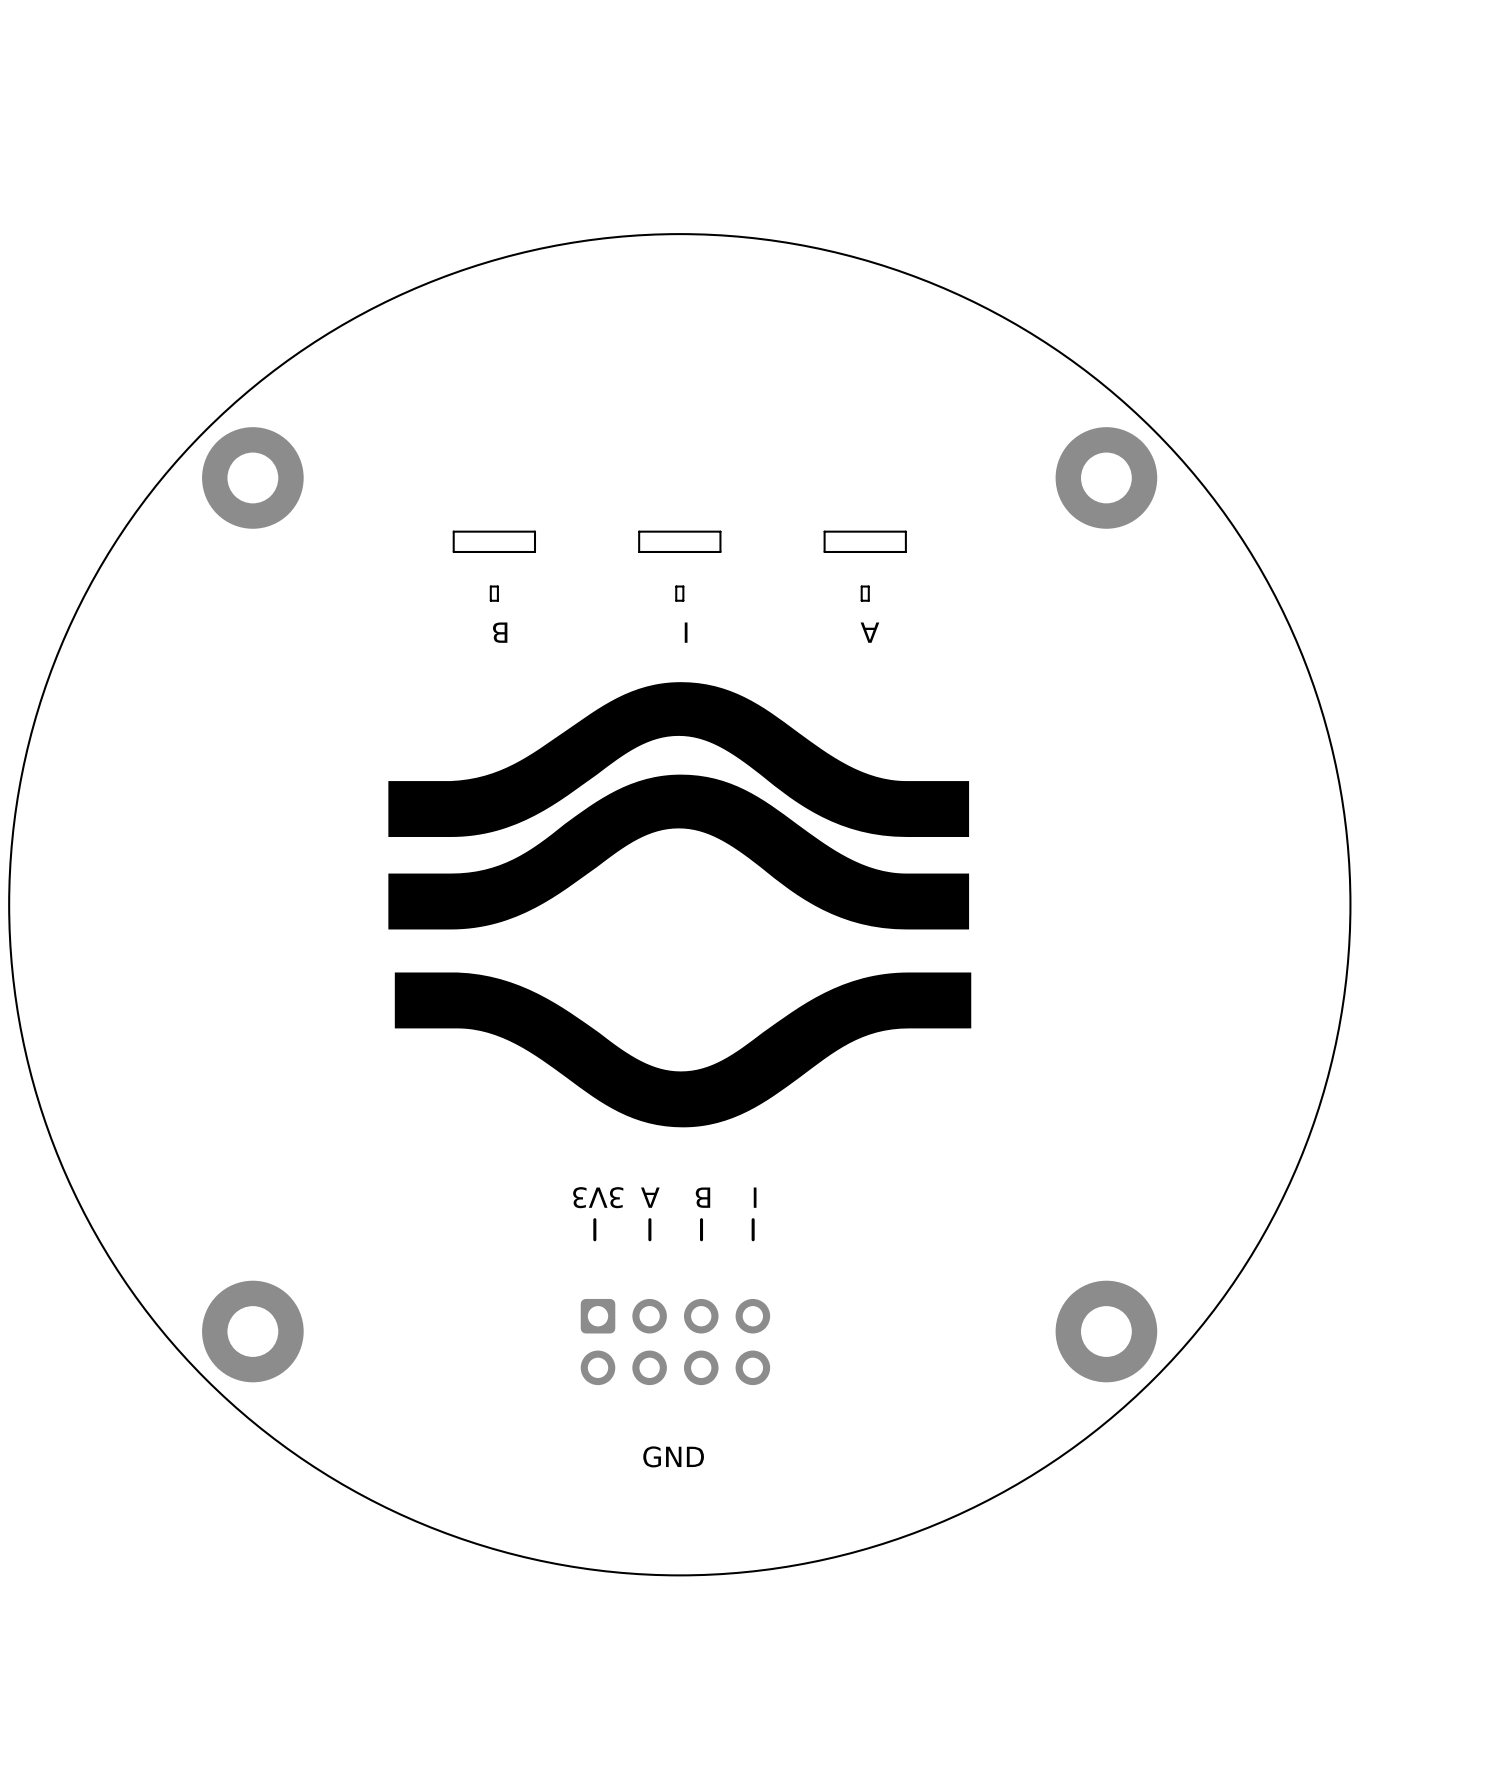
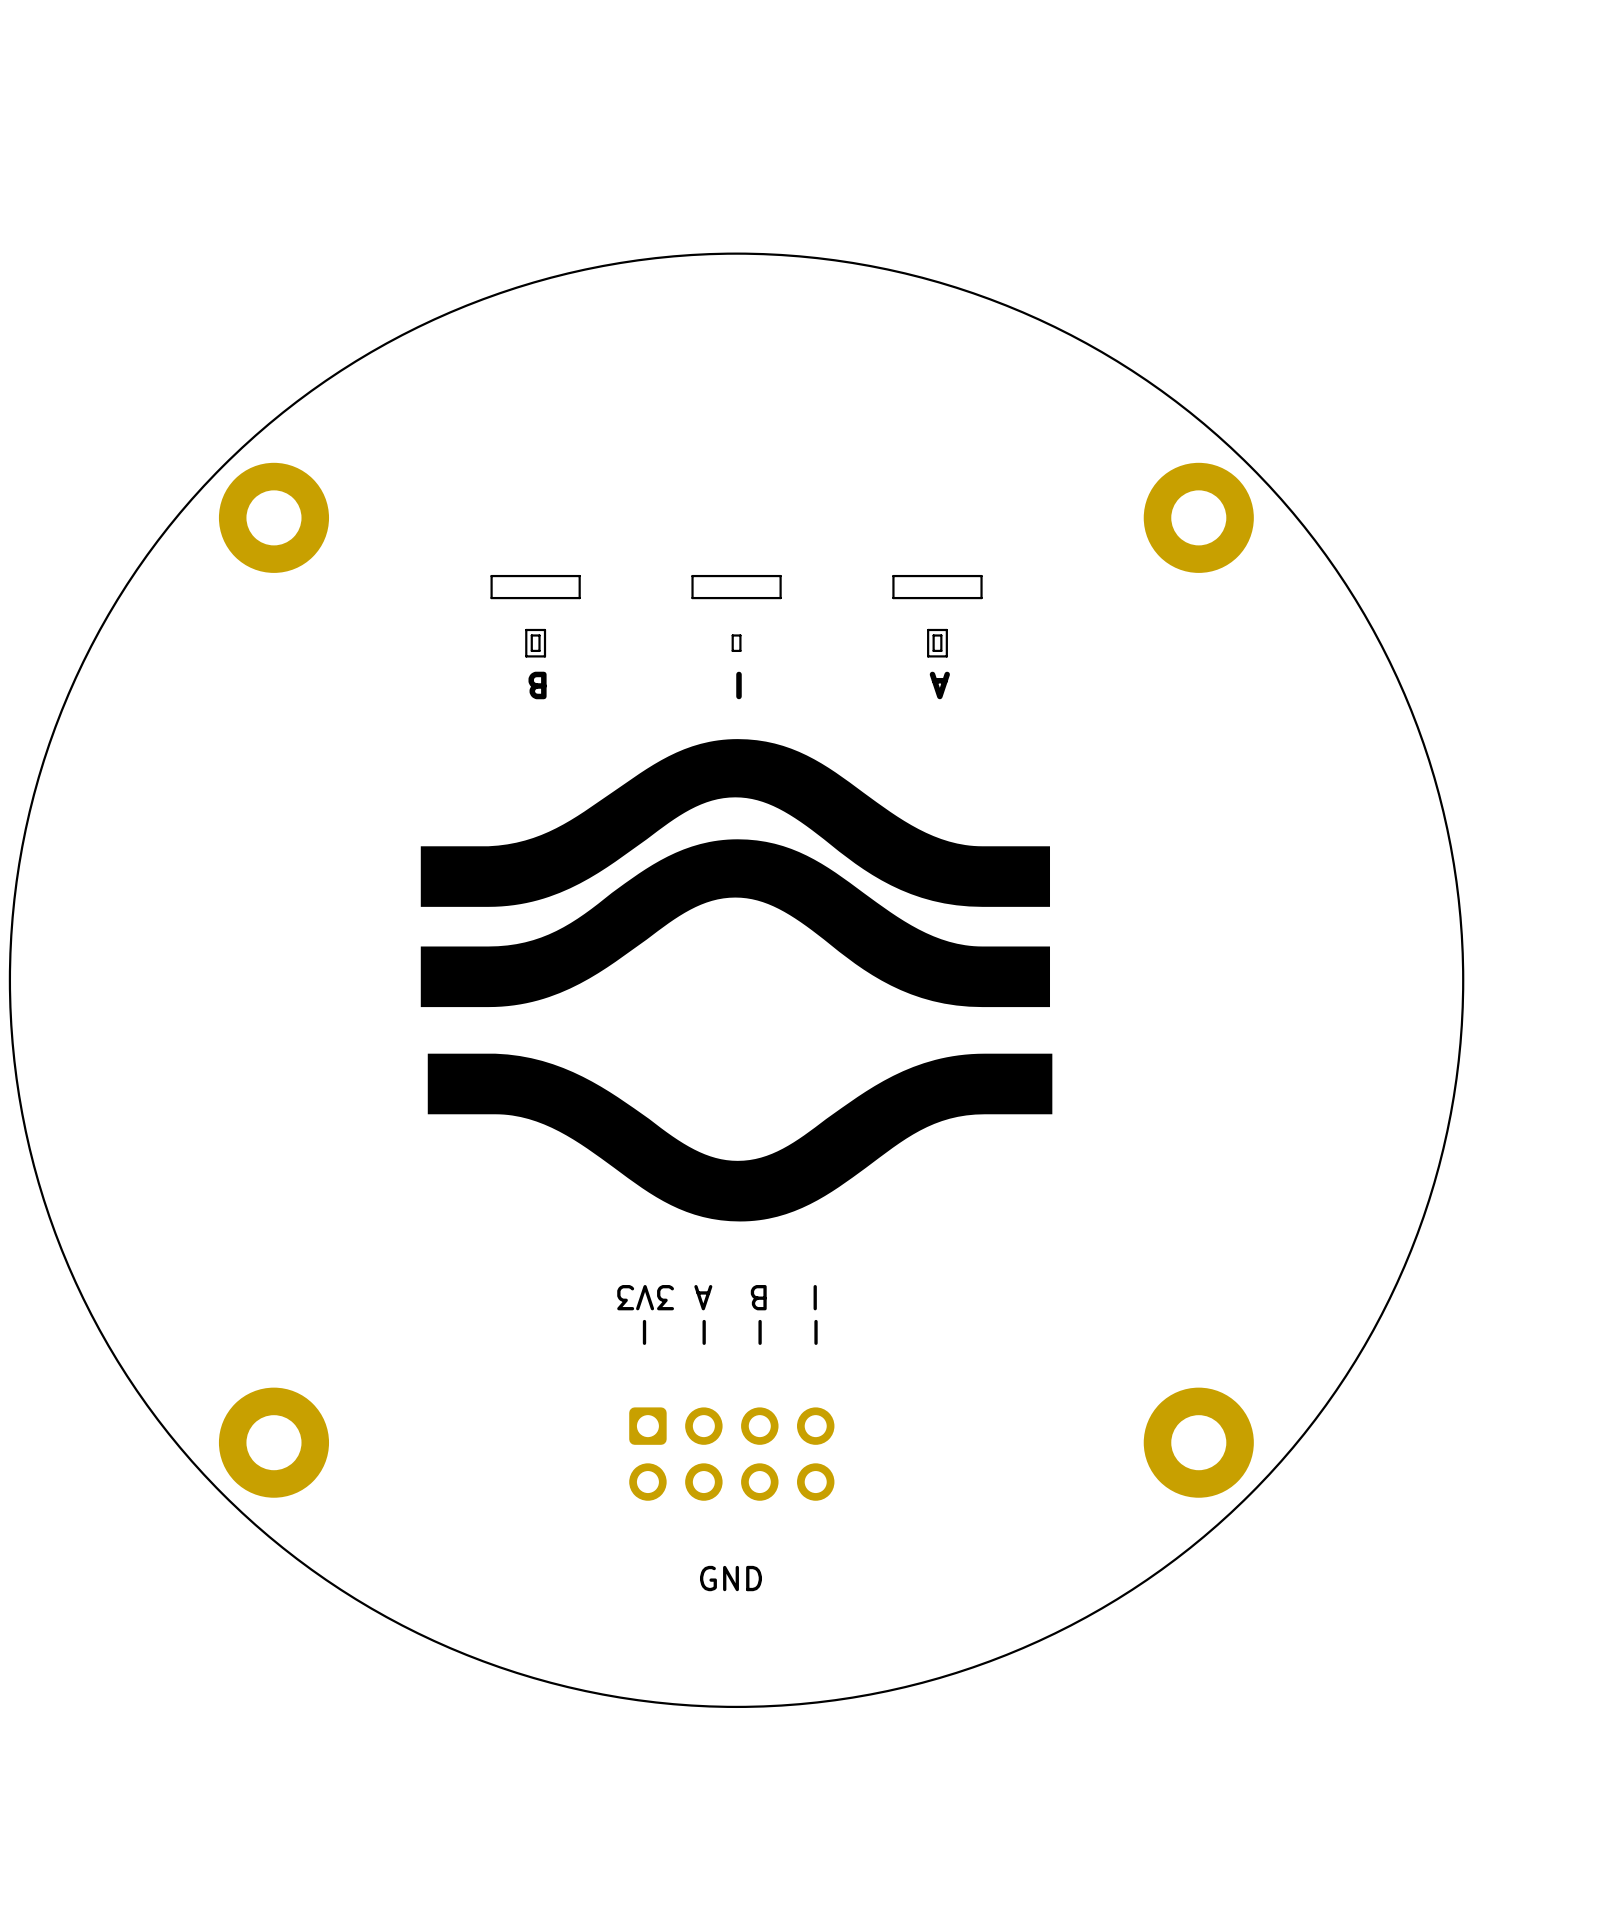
board edge: none -> (544, 629) (526, 629) (526, 656) (544, 656) (544, 629)
board edge: none -> (946, 629) (928, 629) (928, 656) (946, 656) (946, 629)

